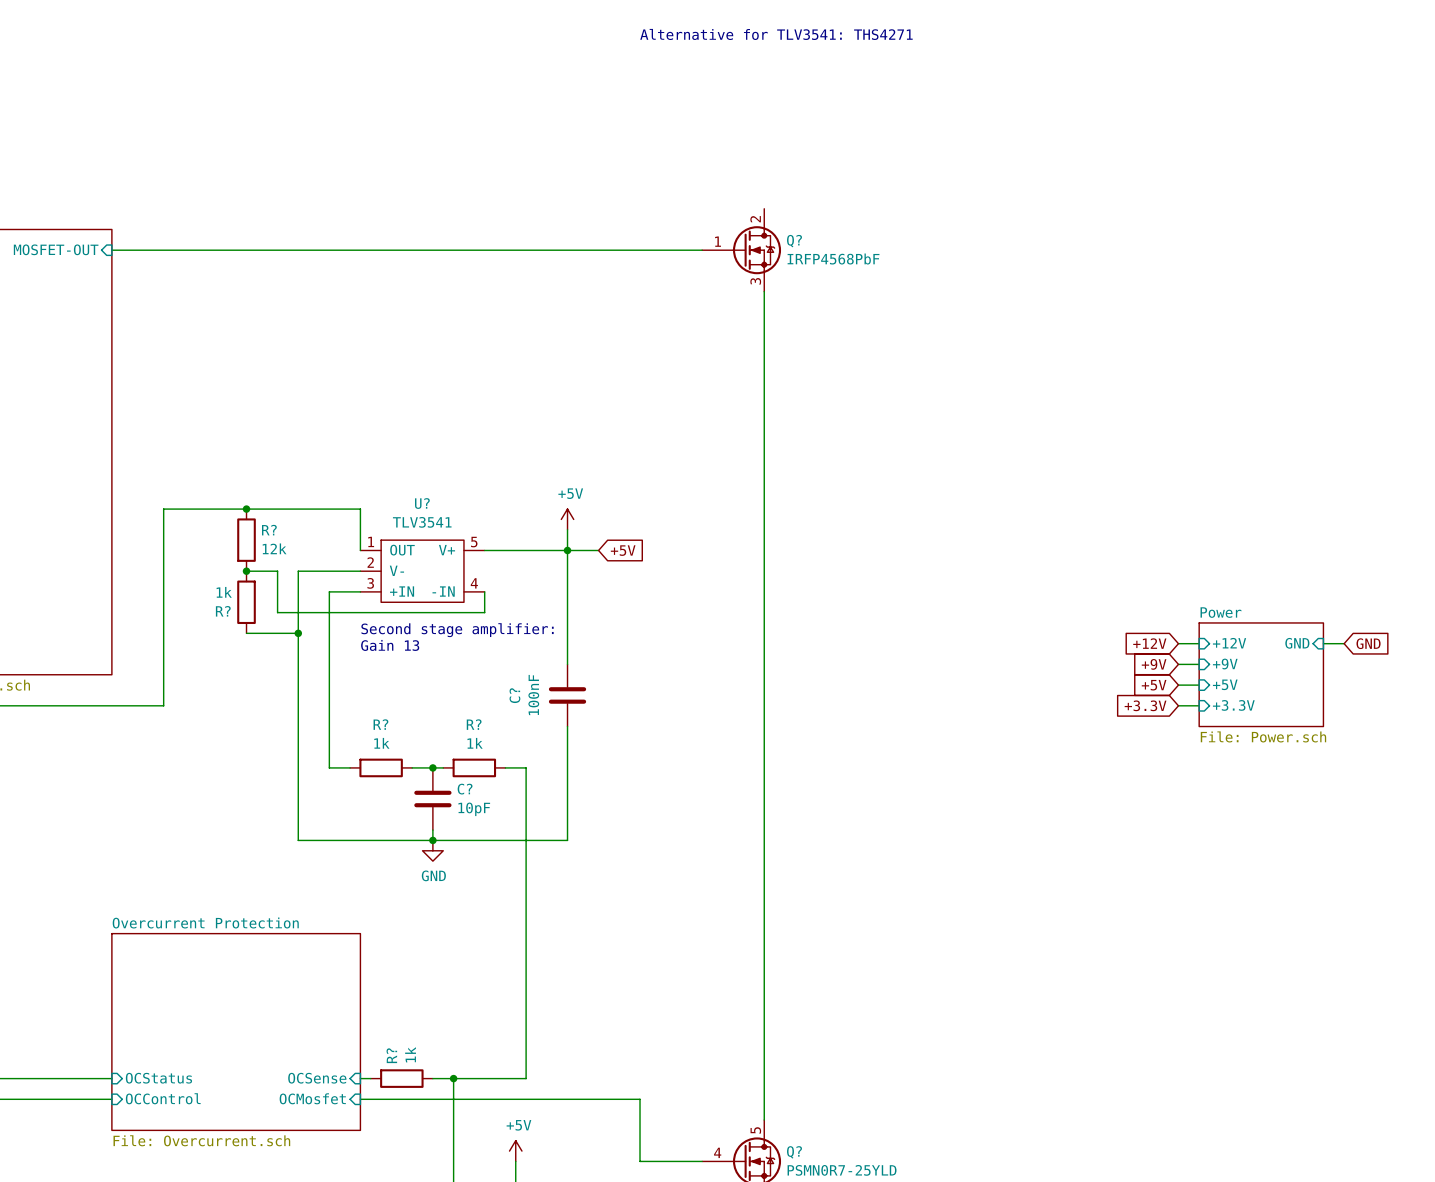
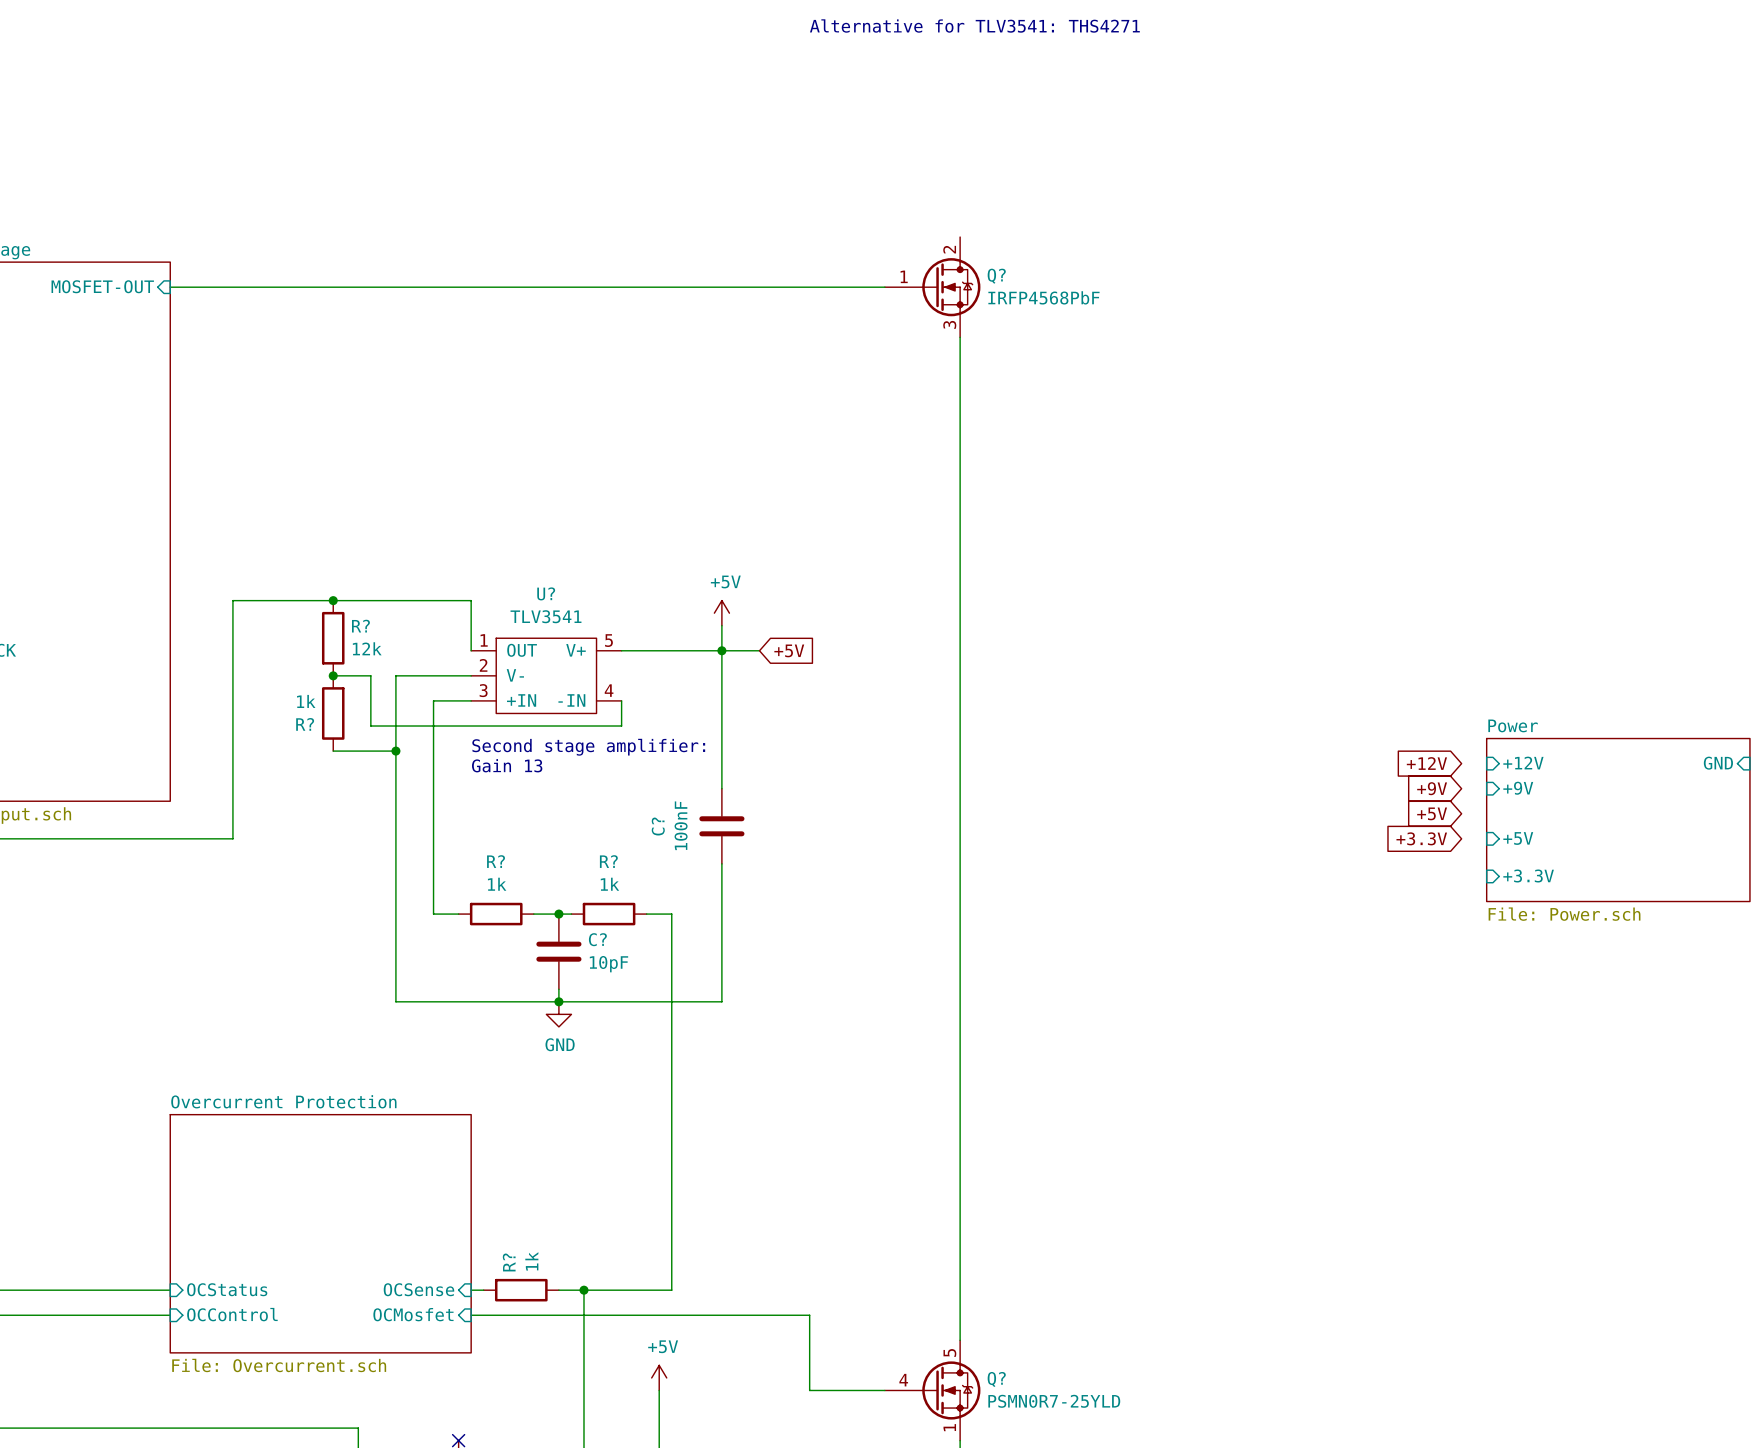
wire: (1178, 643) (1199, 643) -> none
sheet pin position: GND (1297, 643) -> GND (1718, 763)
wire: (1323, 643) (1344, 643) -> none
global label: GND (1368, 643) -> none
wire: (1178, 664) (1199, 664) -> none
sheet Power: File: Power.sch (1261, 674) -> none
sheet pin: +5V (1225, 684) -> none
wire: (1178, 685) (1199, 685) -> none
sheet Power: none -> File: Power.sch (1618, 820)
wire: (1178, 705) (1199, 705) -> none
sheet pin: +3.3V (1233, 705) -> +5V (1518, 838)
sheet pin: none -> +3.3V (1528, 875)

